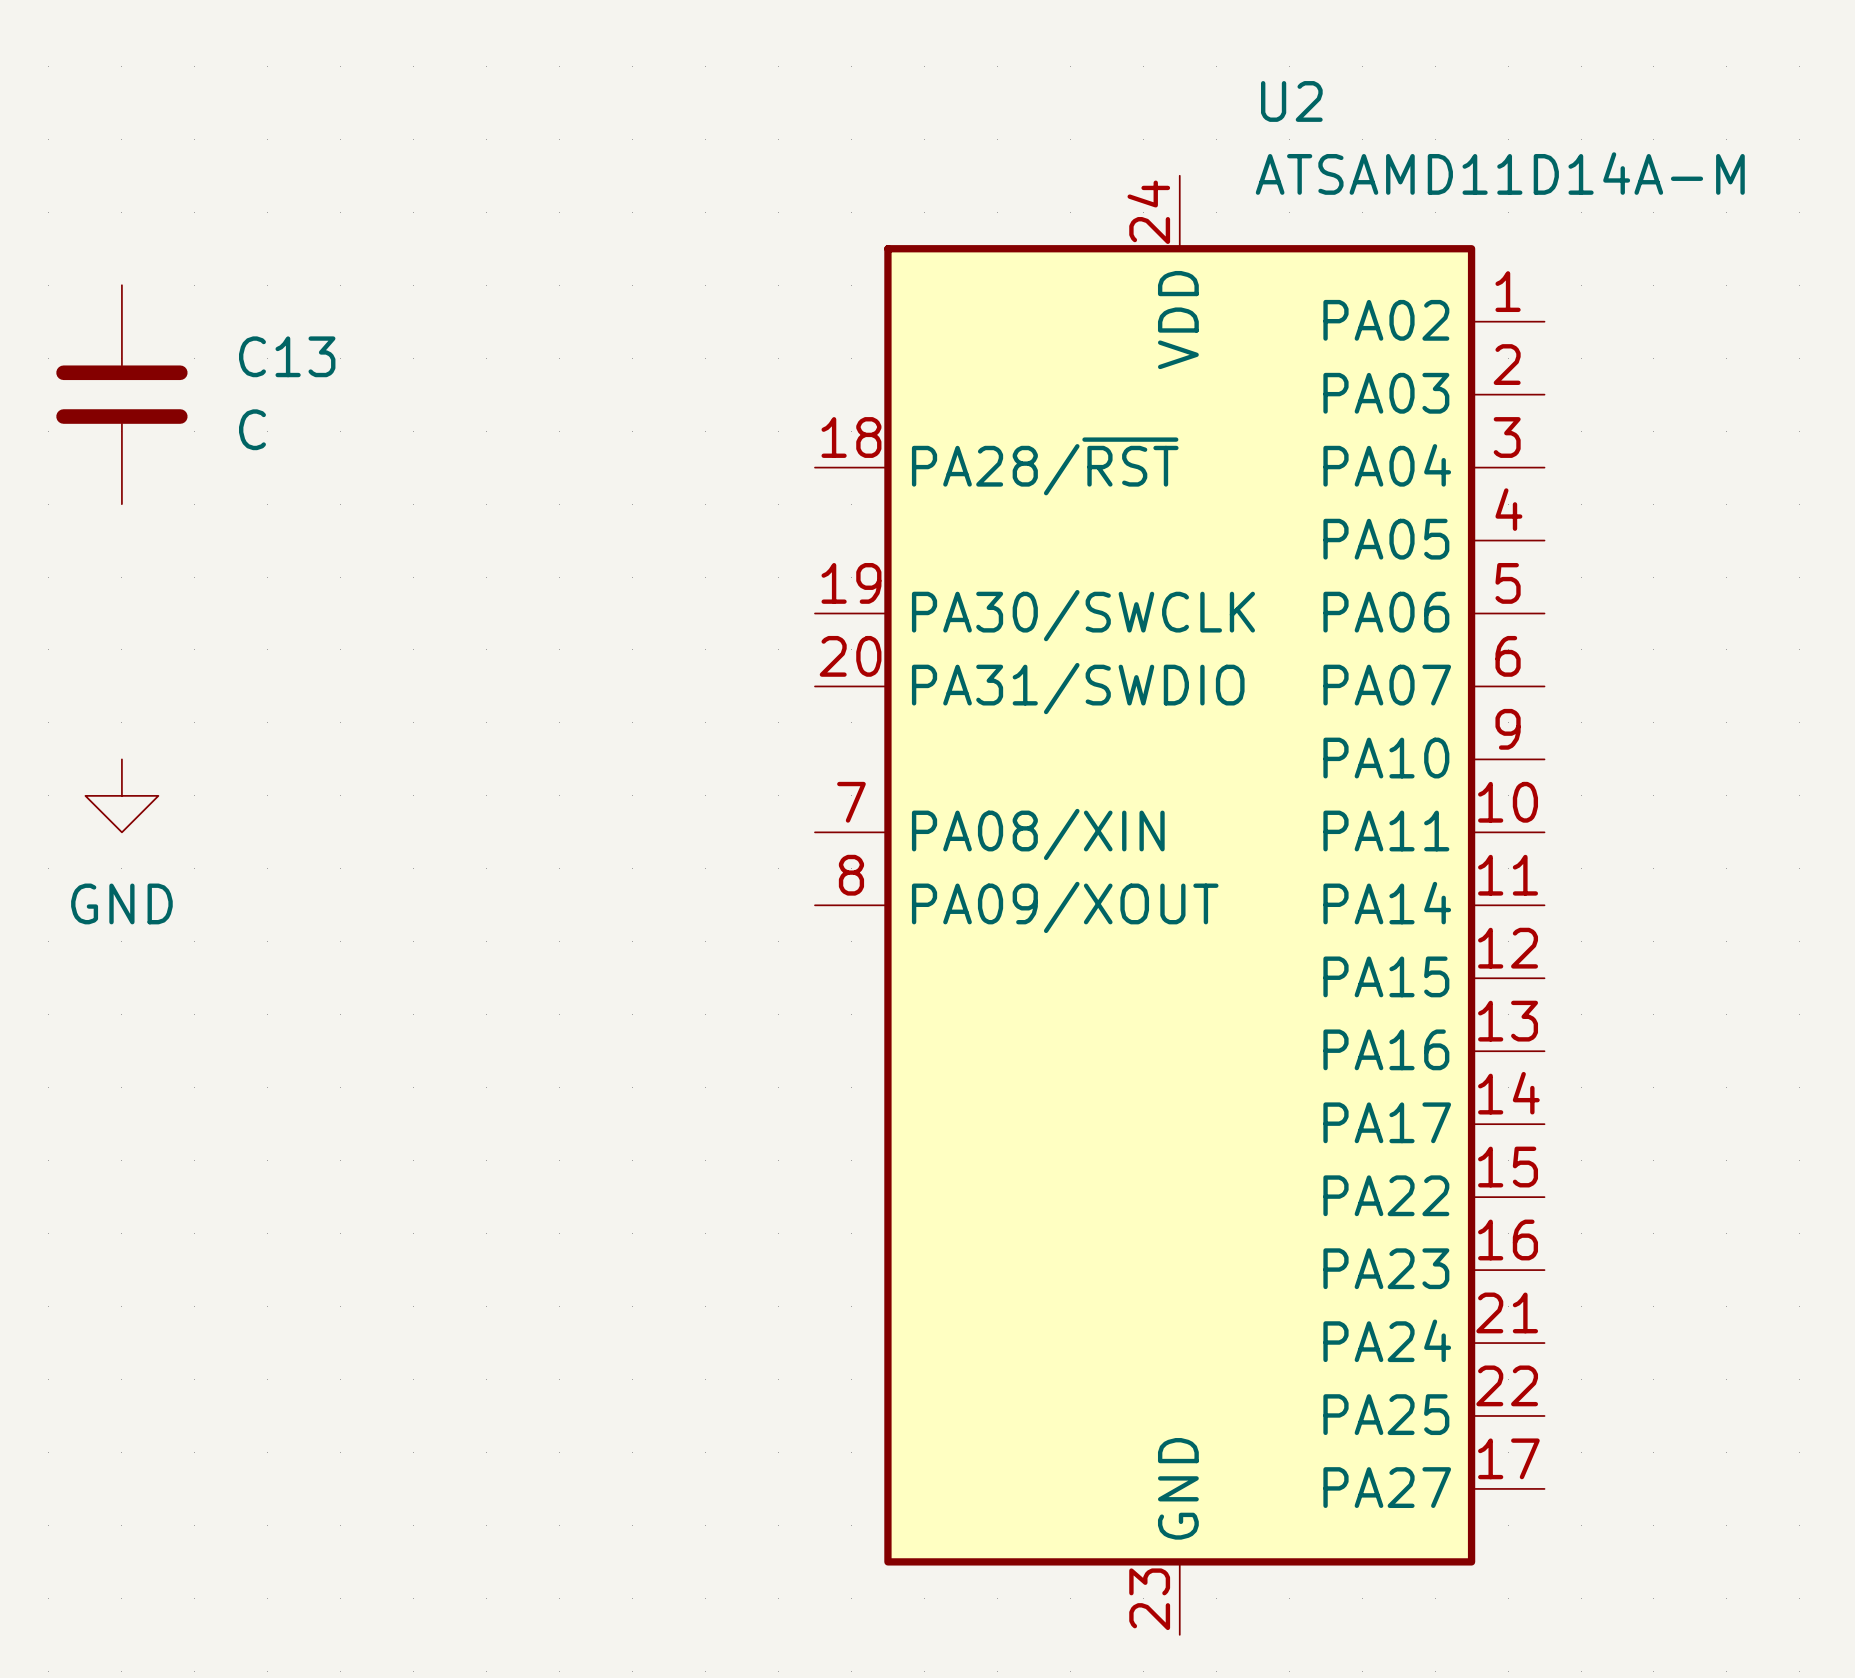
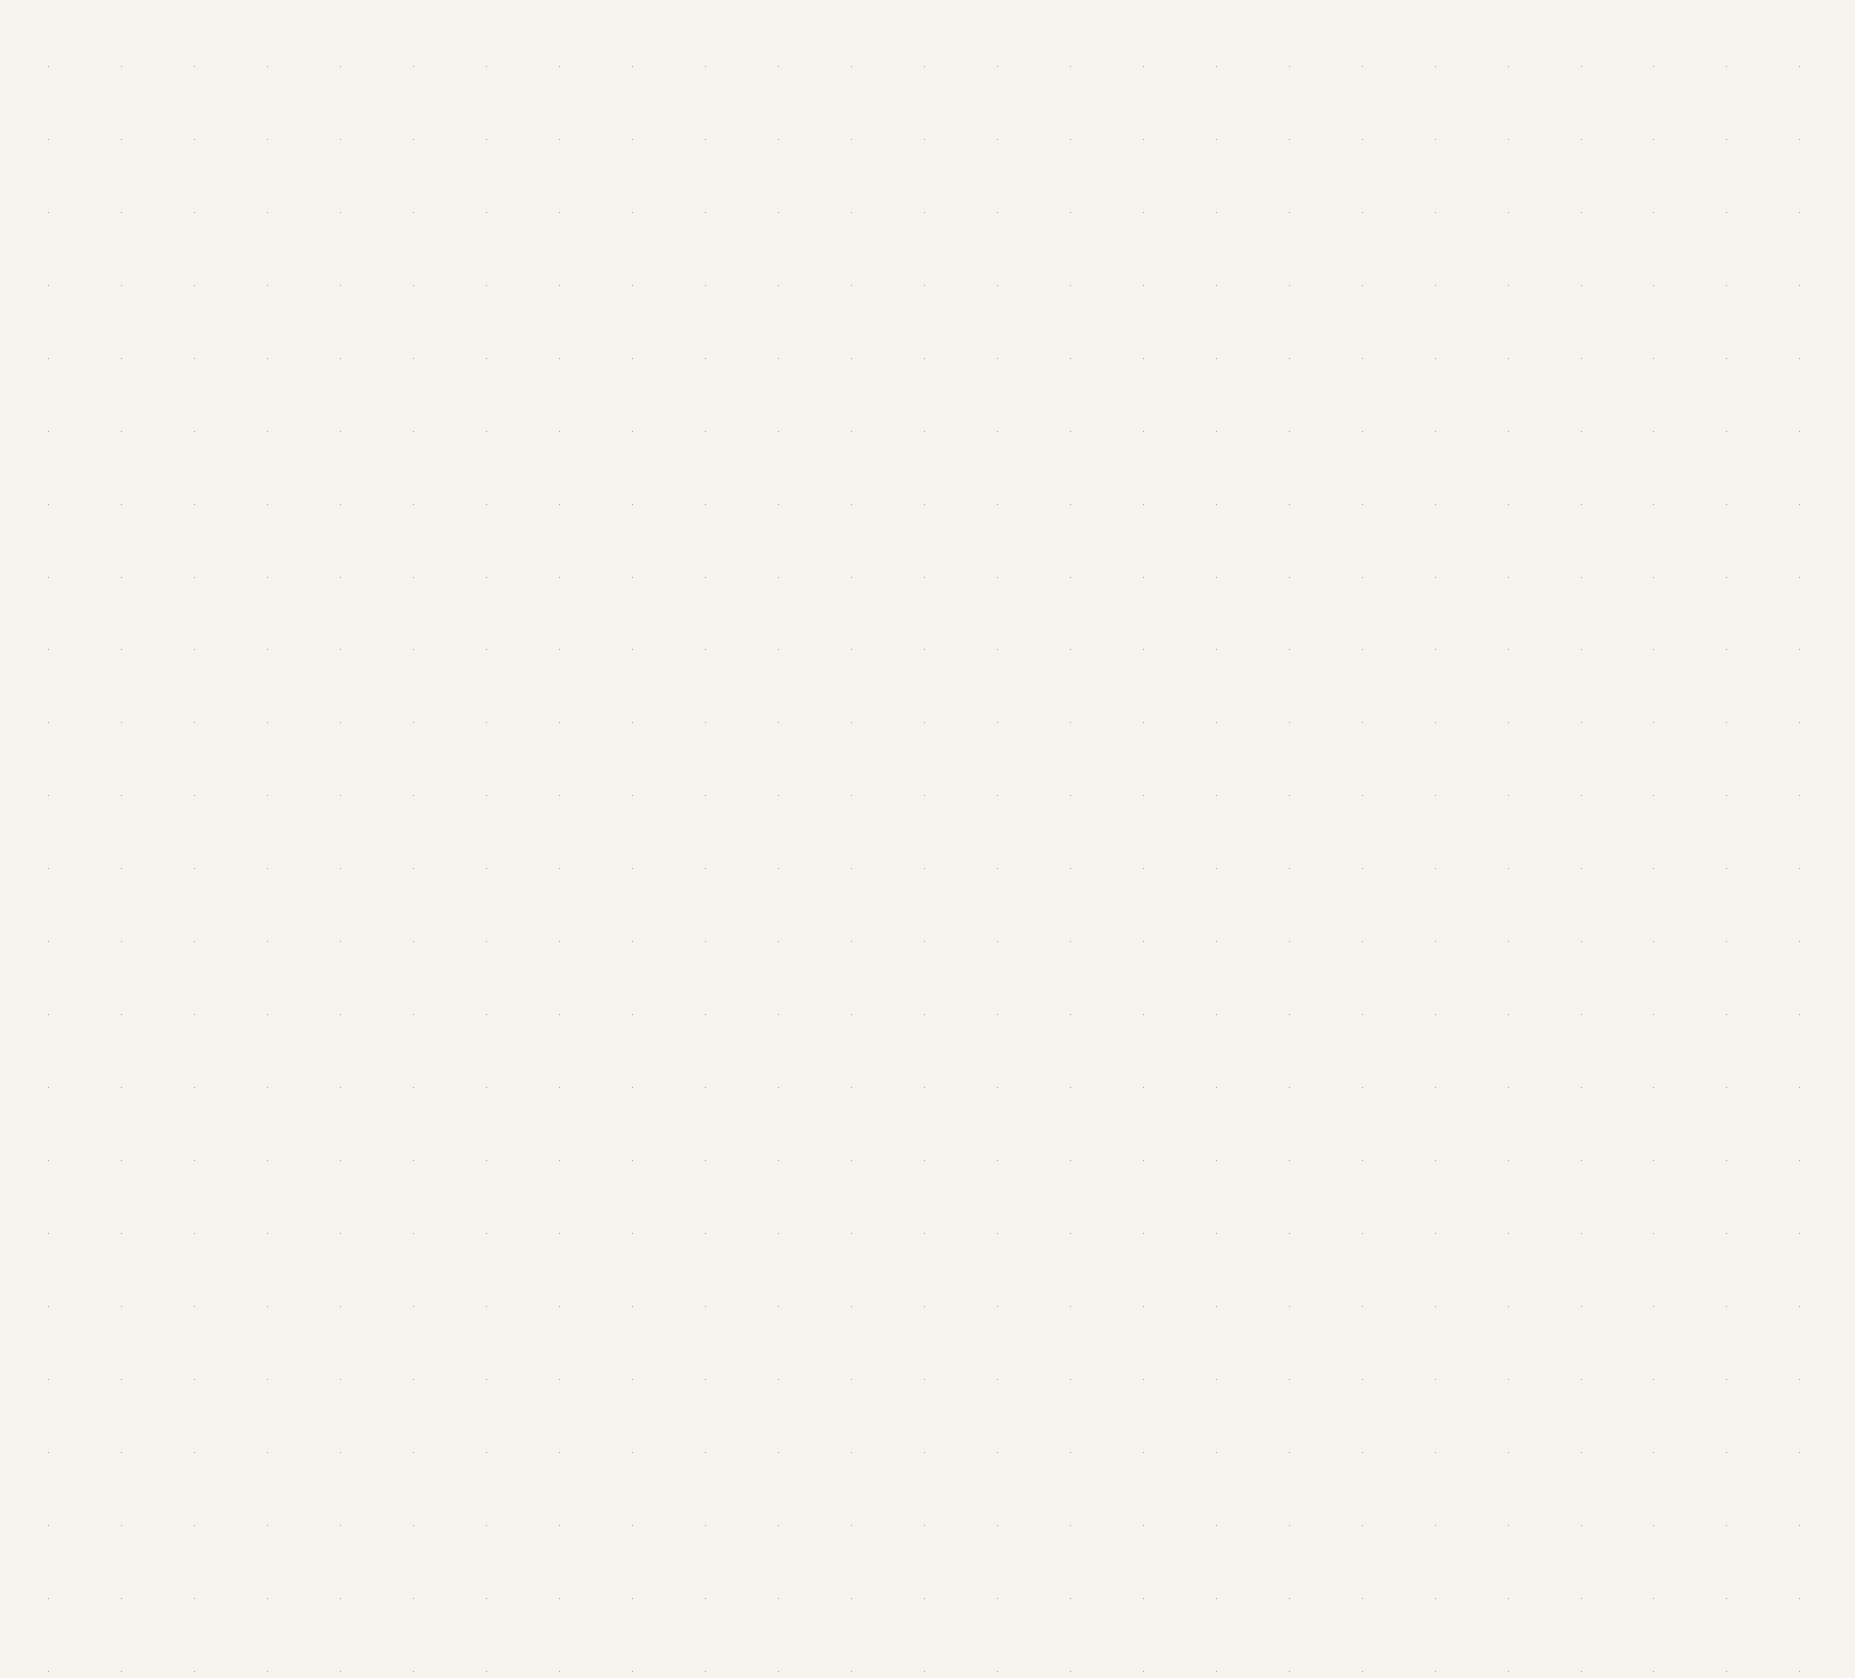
C13: C (121, 394) -> none
power symbol: GND (121, 795) -> none
U2: ATSAMD11D14A-M (1179, 905) -> none

